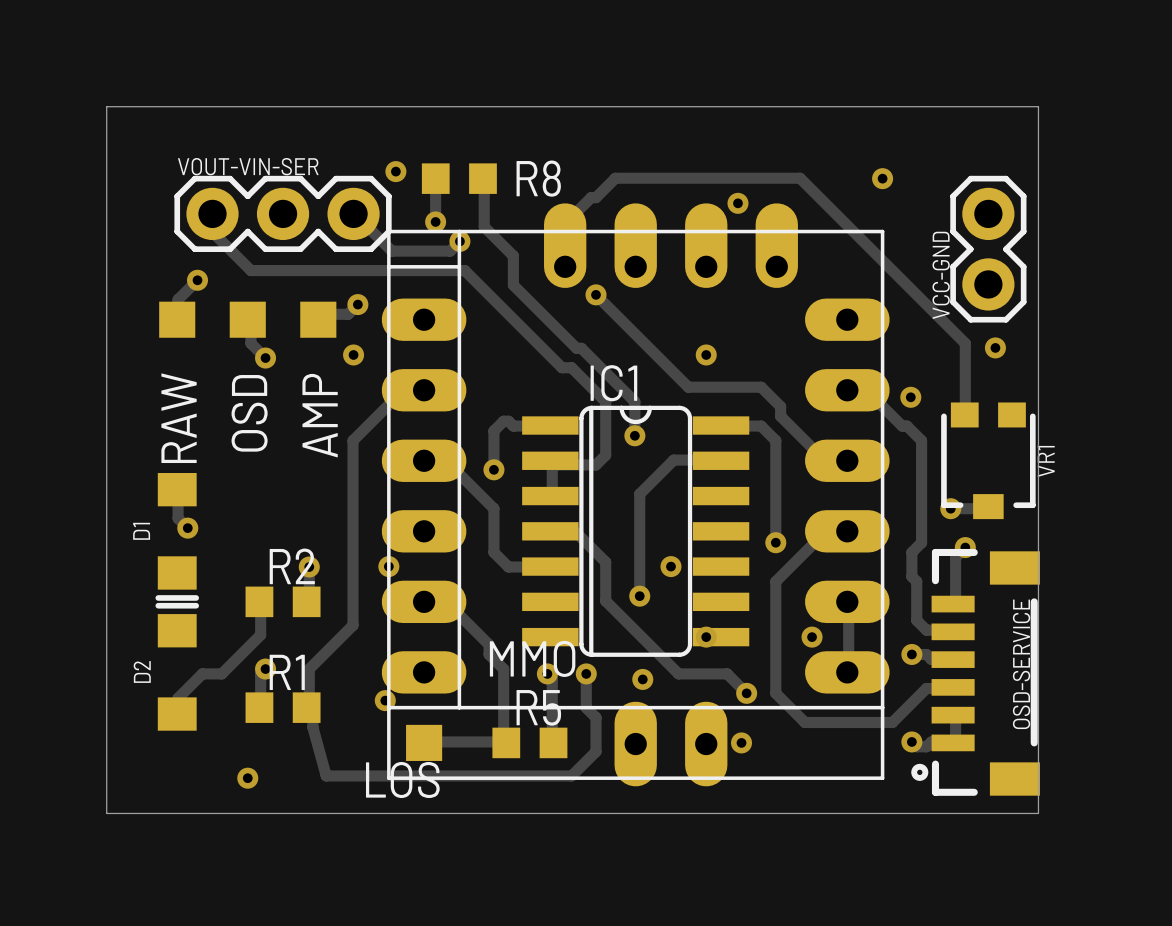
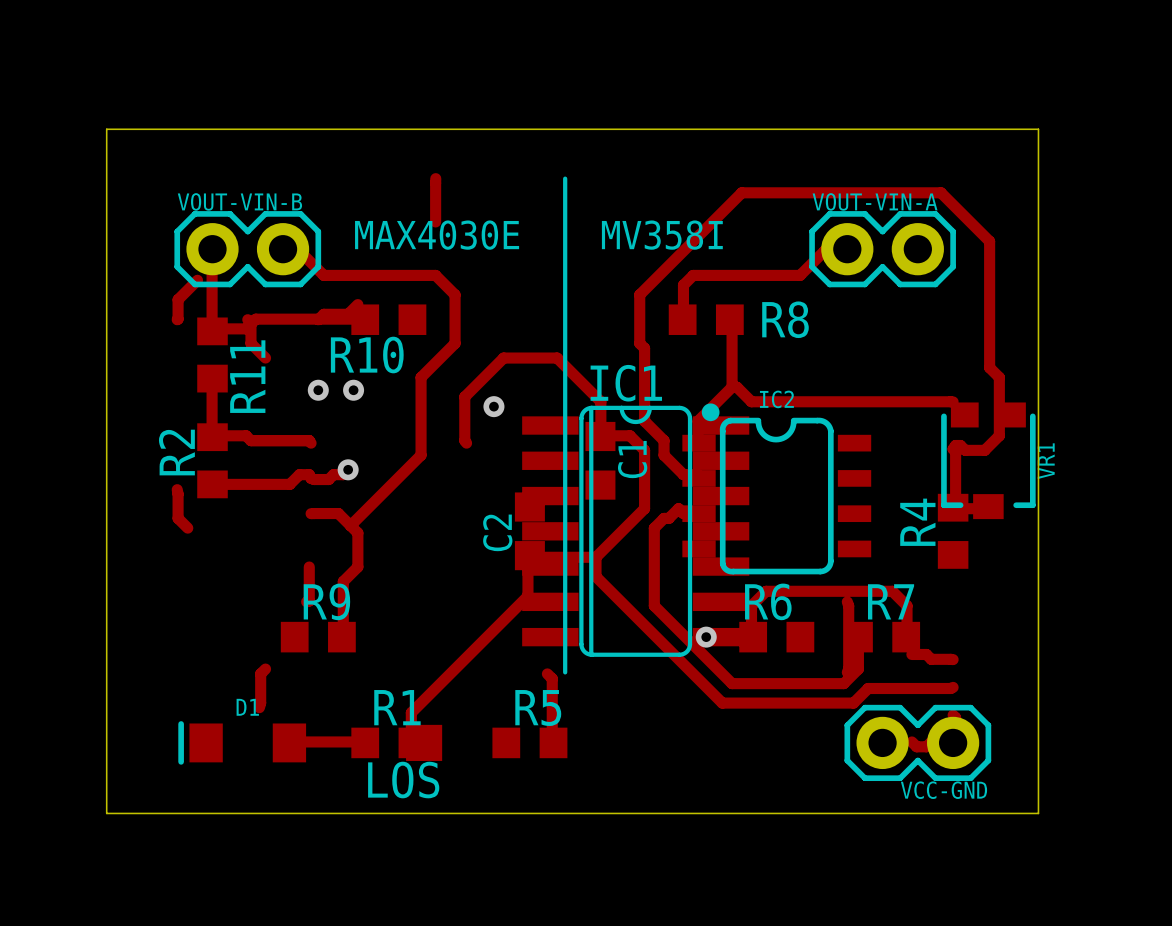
board edge: (106, 129) (106, 106) (1038, 106) (1038, 129) -> (106, 129) (1038, 129)
via: (395, 171) -> none
R8 position: (459, 178) -> (706, 319)
track: (482, 178) (484, 226) (513, 255) (513, 285) (576, 348) (581, 348) (634, 401) (634, 435) -> none
line: none -> (565, 178) (565, 672)
via: (882, 178) -> none
via: (737, 203) -> none
track: (212, 213) (216, 217) (216, 236) (250, 270) (464, 270) (561, 367) (571, 367) (605, 401) (605, 455) (596, 464) (557, 464) (550, 460) (552, 464) (552, 494) (550, 496) -> none
VOUT-VIN-SER: (283, 213) -> none
track: (353, 213) (391, 251) (450, 251) (459, 241) -> none
via: (435, 221) -> none
text: none -> MAX4030E (437, 235)
text: none -> MV358I (662, 235)
via: (459, 241) -> none
track: none -> (212, 249) (212, 331) (216, 328) (246, 328) (255, 319) (365, 319)
VOUT-VIN-B: none -> (247, 249)
track: none -> (283, 249) (284, 251) (299, 251) (323, 275) (435, 275) (455, 294) (455, 343) (421, 377) (421, 455) (350, 525)
track: none -> (847, 249) (843, 251) (824, 251) (800, 275) (693, 275) (683, 285) (682, 319)
VOUT-VIN-A: none -> (882, 249)
VCC-GND rotation: 0° (988, 249) -> 90° clockwise (917, 742)
VCC-GND position: (988, 249) -> (917, 742)
track: (565, 266) (566, 265) (566, 221) (591, 197) (596, 197) (615, 178) (800, 178) (965, 343) (964, 414) -> none
VCC-GND name position: VCC-GND (941, 275) -> VCC-GND (943, 790)
via: (197, 280) -> none
track: (596, 294) (688, 387) (732, 387) -> none
via: (596, 294) -> none
via: (357, 304) -> none
RAW: (177, 319) -> none
OSD: (247, 319) -> none
AMP: (318, 319) -> none
R10: none -> (388, 319)
track: none -> (729, 319) (732, 324) (732, 387) (698, 421) (699, 443)
via: (995, 347) -> none
R11: none -> (212, 354)
via: (353, 354) -> none
via: (706, 354) -> none
via: (265, 358) -> none
track: none -> (212, 378) (212, 437) (246, 435) (250, 440) (309, 440) (311, 443)
track: (736, 387) (761, 387) (780, 406) (780, 416) (824, 460) (847, 460) -> (736, 387) (751, 401) (953, 401)
via: none -> (318, 390)
via: none -> (353, 390)
track: (424, 390) (421, 392) (401, 392) (353, 440) (353, 625) (309, 669) (309, 703) (306, 707) (309, 707) (303, 707) (312, 717) (312, 727) (326, 775) (571, 775) (596, 751) (596, 717) (586, 707) (586, 673) -> none
track: (847, 390) (848, 392) (868, 392) (902, 426) (907, 426) (921, 440) (921, 542) (911, 552) (911, 576) (916, 581) (916, 620) (926, 630) (950, 630) (953, 631) -> none
via: (910, 397) -> none
track: (550, 425) (513, 426) (508, 421) (503, 421) (493, 430) (493, 469) -> none
track: (721, 425) (761, 426) (775, 440) (775, 542) -> none
via: (634, 435) -> none
track: none -> (466, 443) (464, 440) (464, 396) (503, 358) (557, 358) (600, 401) (600, 426) (596, 430) (596, 435) (630, 435) (644, 450) (644, 508) (596, 557)
track: (424, 460) (425, 464) (450, 464) (493, 508) (493, 552) (508, 567) (550, 566) -> none
C1: none -> (600, 460)
track: (721, 460) (673, 460) (639, 494) (639, 596) -> none
track: none -> (348, 469) (343, 474) (333, 474) (328, 479) (314, 479) (309, 474) (299, 474) (289, 484) (212, 484)
via: none -> (348, 469)
via position: (493, 469) -> (493, 406)
track: none -> (699, 478) (698, 474) (683, 474) (664, 455) (664, 440) (644, 421) (644, 348) (639, 343) (639, 294) (741, 192) (941, 192) (989, 241) (989, 367) (999, 377) (999, 435) (984, 450) (965, 450) (960, 445) (955, 445) (953, 449) (955, 450) (955, 503) (953, 507)
IC2: none -> (776, 488)
part: (635, 494) -> none
via: (950, 508) -> none
track: none -> (311, 513) (338, 513) (357, 532) (357, 567) (343, 581) (341, 637)
track: none -> (699, 513) (683, 513) (678, 508) (668, 518) (664, 518) (654, 528) (654, 605) (732, 683) (843, 683) (858, 669) (858, 637)
via: (187, 528) -> none
C2: none -> (529, 531)
track: (550, 531) (552, 532) (576, 532) (605, 562) (605, 601) (678, 673) (727, 673) (746, 693) -> none
track: (847, 531) (824, 532) (775, 581) (775, 693) (804, 722) (892, 722) (926, 688) -> (596, 557) (596, 576) (722, 703) (853, 703) (868, 688) (926, 688)
R4: none -> (953, 531)
D1 rotation: 0° (177, 536) -> 90° clockwise (242, 742)
D1 position: (177, 536) -> (242, 742)
via: (775, 542) -> none
track: (965, 547) (955, 557) (955, 601) (953, 604) -> none
via: (965, 547) -> none
track: none -> (596, 557) (532, 557) (529, 555) (527, 557) (527, 596) (411, 712) (412, 742)
R2 name position: R2 (292, 566) -> R2 (176, 452)
via: (388, 566) -> none
via: (670, 566) -> none
via: (309, 567) -> none
via: (639, 596) -> none
track: (259, 601) (260, 635) (221, 673) (202, 673) (178, 698) (177, 714) -> none
R2 rotation: 0° (283, 601) -> 90° clockwise (212, 460)
R2 position: (283, 601) -> (212, 460)
track: (424, 601) (425, 605) (450, 605) (489, 644) (489, 654) (503, 669) (503, 737) (506, 742) (424, 742) -> none
R9: none -> (318, 637)
track: none -> (753, 637) (751, 635) (751, 605) (766, 591) (892, 591) (907, 605) (906, 637)
R6: none -> (776, 637)
via: (812, 637) -> none
R7: none -> (882, 637)
via: (911, 654) -> none
D2: (177, 666) -> none
via: (265, 669) -> none
OSD-SERVICE: (975, 672) -> none
via: (547, 673) -> none
via: (586, 673) -> none
via: (642, 679) -> none
via: (746, 693) -> none
via: (385, 700) -> none
R1 position: (283, 707) -> (388, 742)
via: (911, 741) -> none
track: none -> (289, 742) (365, 742)
via: (741, 742) -> none
via: (247, 778) -> none

